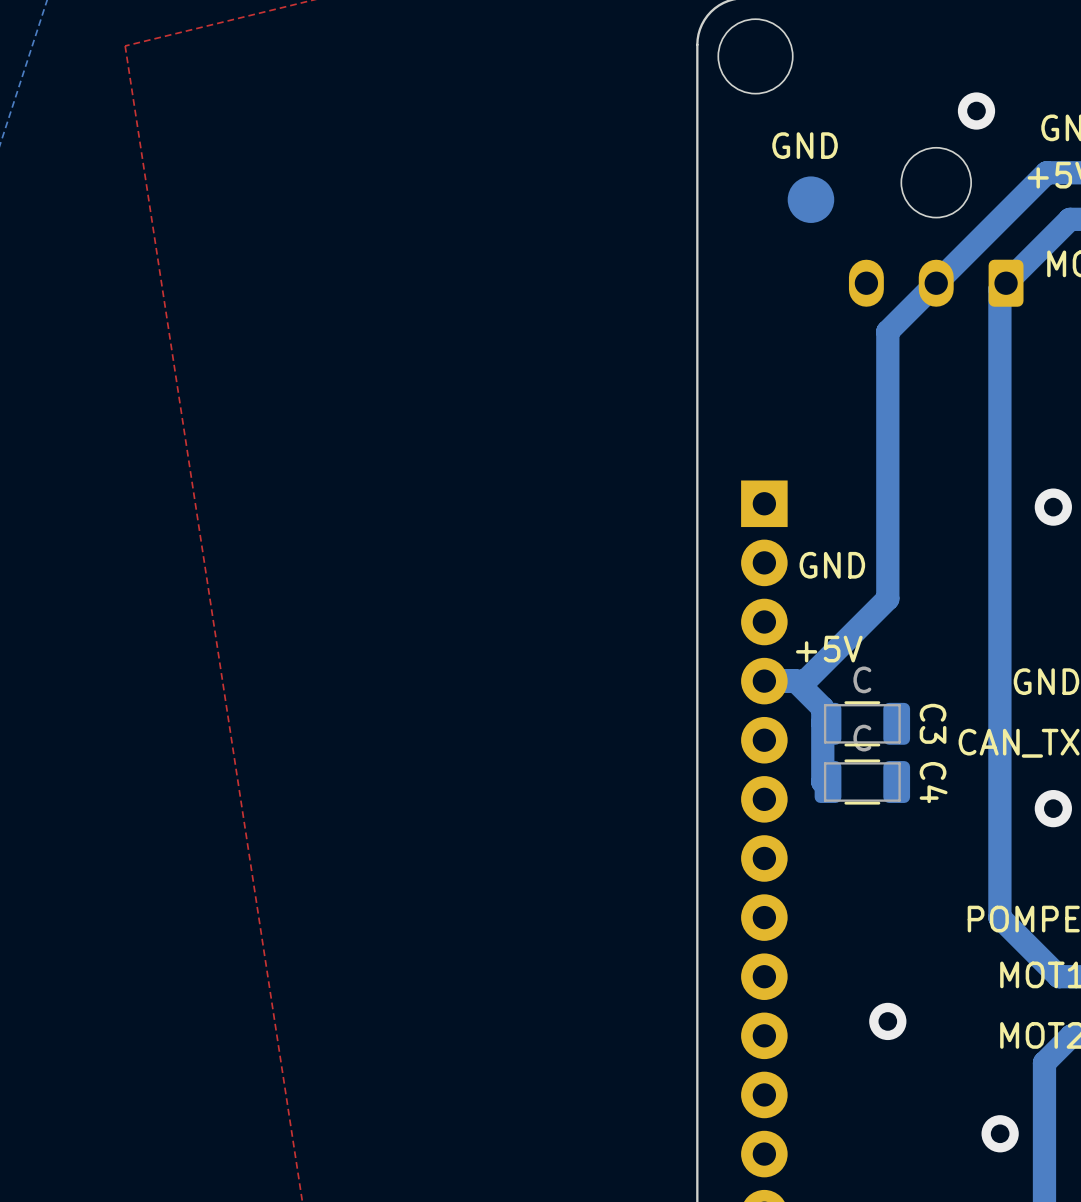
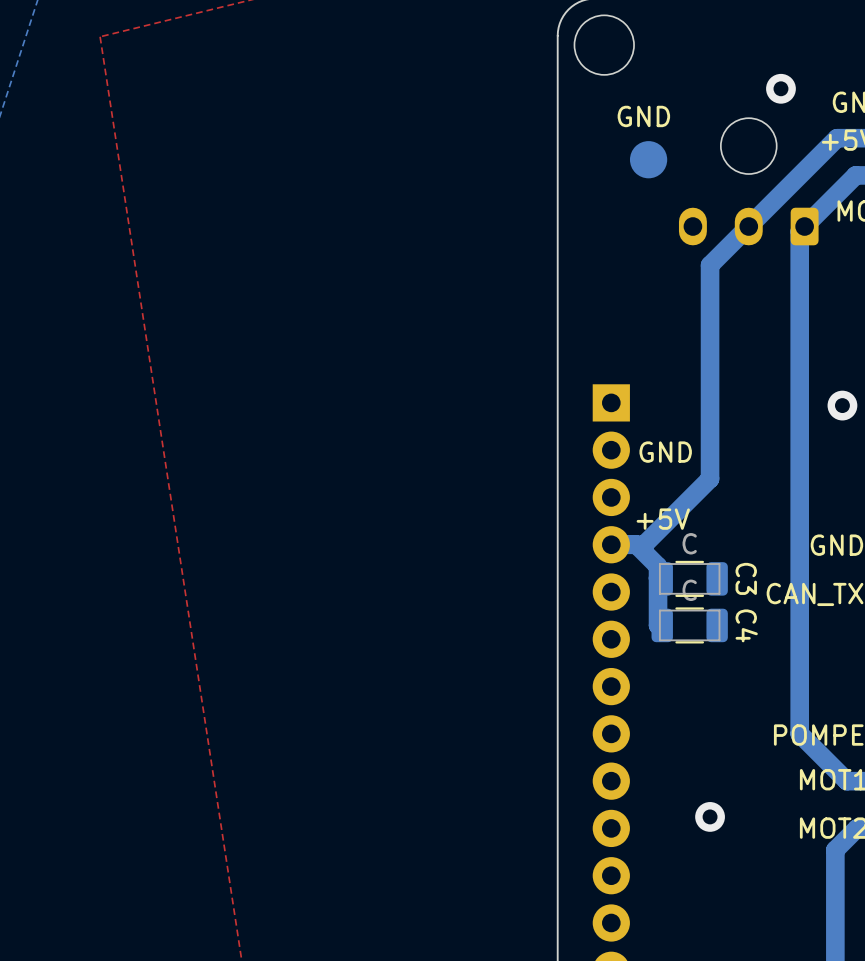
via: (1053, 808) -> none
via: (1000, 1133) -> none

